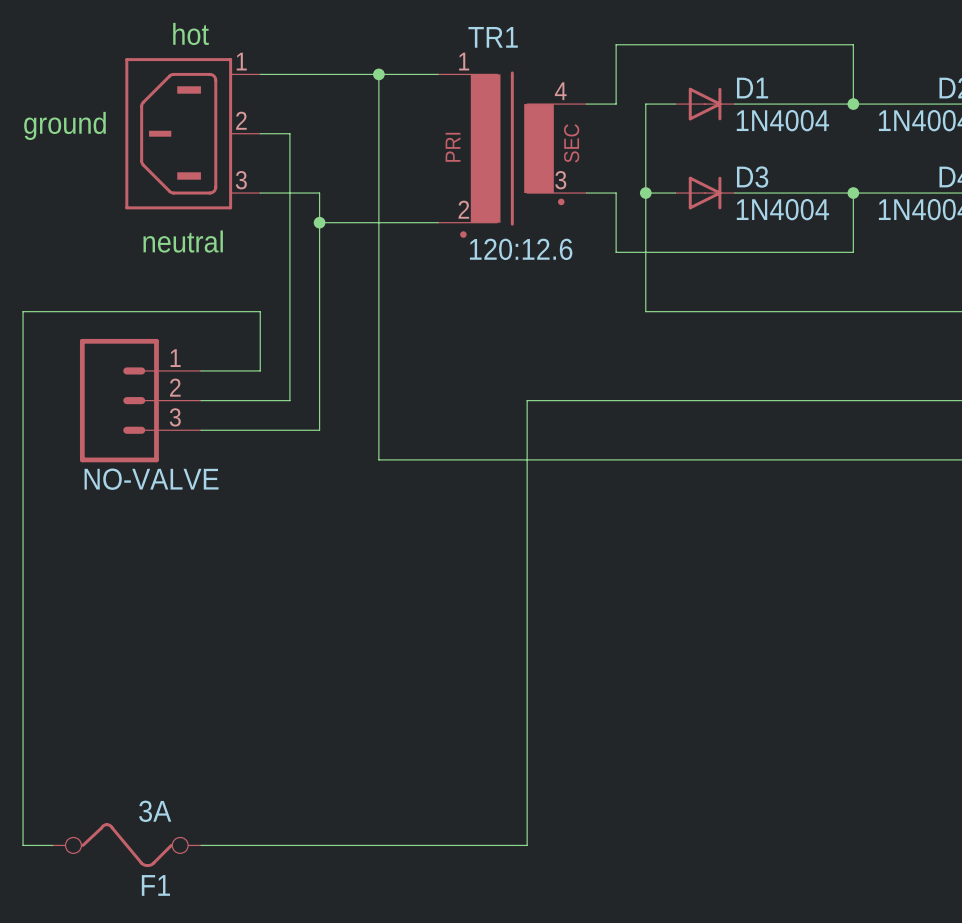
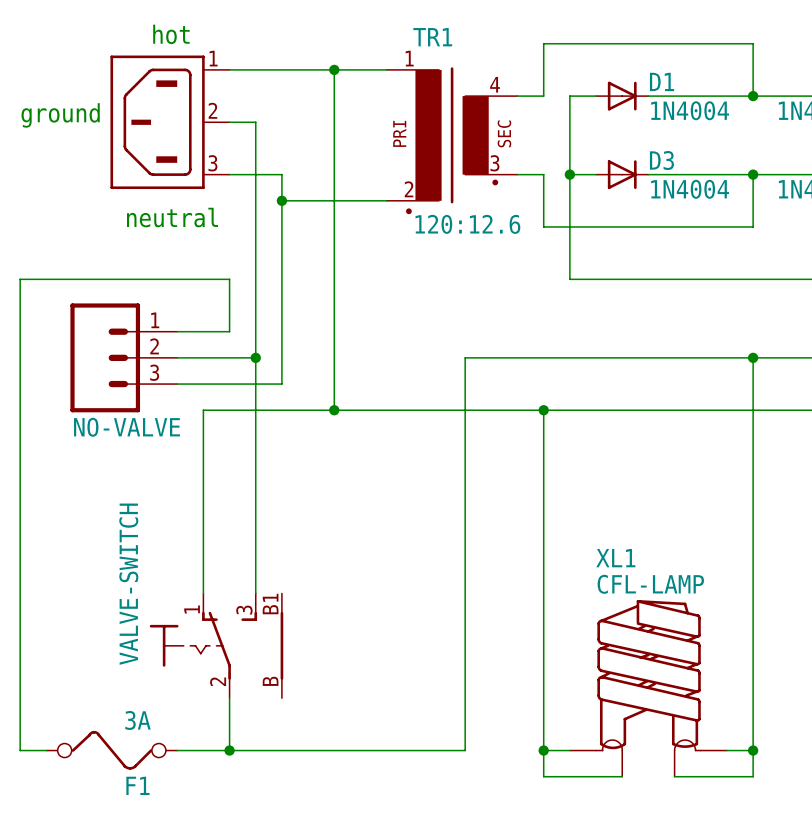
wire: none -> (255, 357) (255, 593)
junction: none -> (255, 357)
wire: none -> (753, 357) (753, 776) (674, 776)
junction: none -> (753, 357)
wire: none -> (334, 410) (203, 410) (203, 593)
junction: none -> (334, 410)
wire: none -> (543, 410) (543, 776) (622, 776)
junction: none -> (543, 410)
VALVE-SWITCH: none -> (216, 645)
XL1: none -> CFL-LAMP (648, 688)
wire: none -> (229, 698) (229, 750)
junction: none -> (229, 750)
wire: none -> (543, 750) (569, 750)
junction: none -> (543, 750)
wire: none -> (726, 750) (753, 750)
junction: none -> (753, 750)

